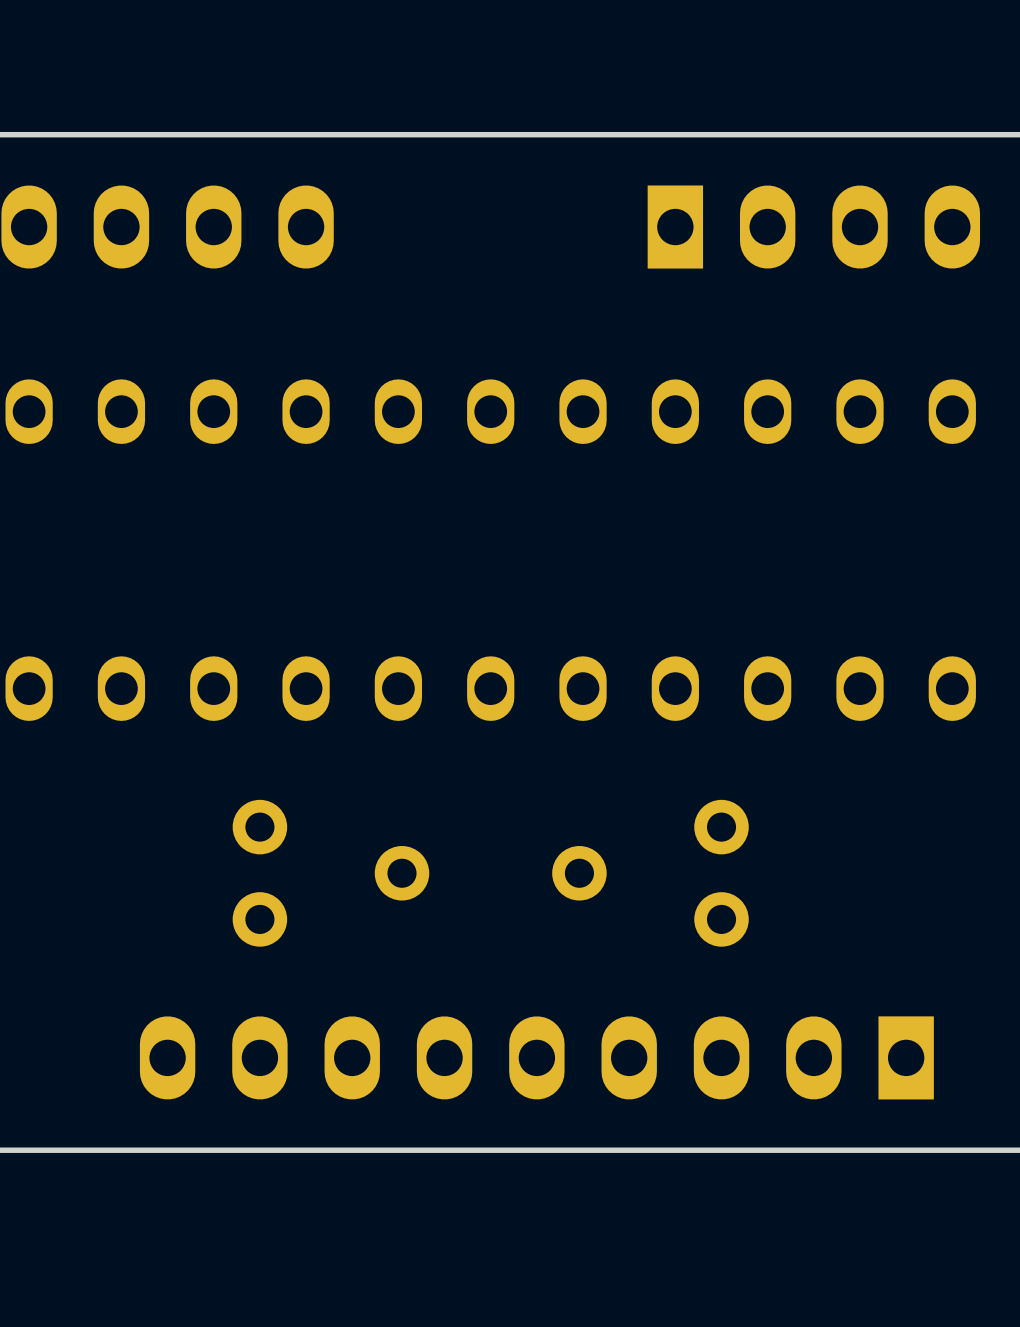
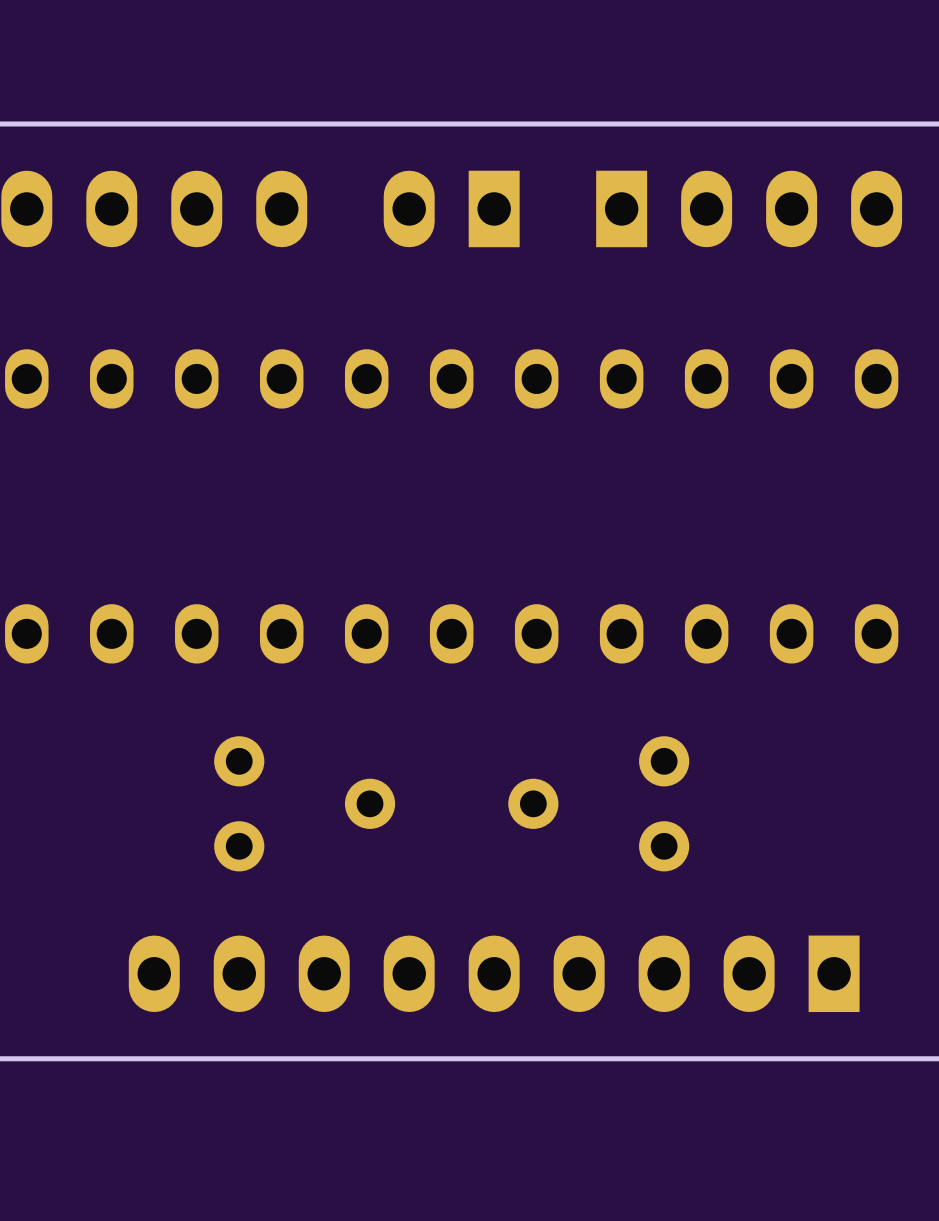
part: none -> (451, 208)

